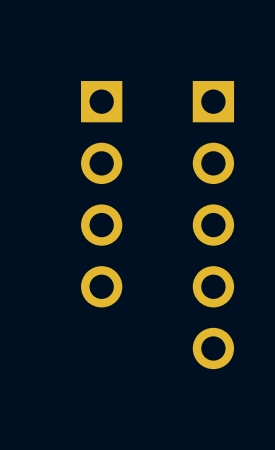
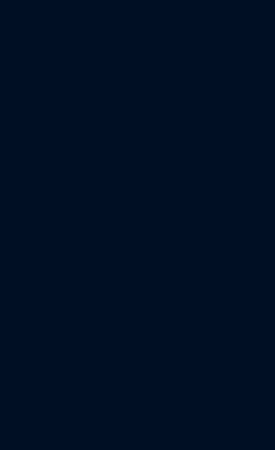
part: (101, 194) -> none
part: (213, 225) -> none

